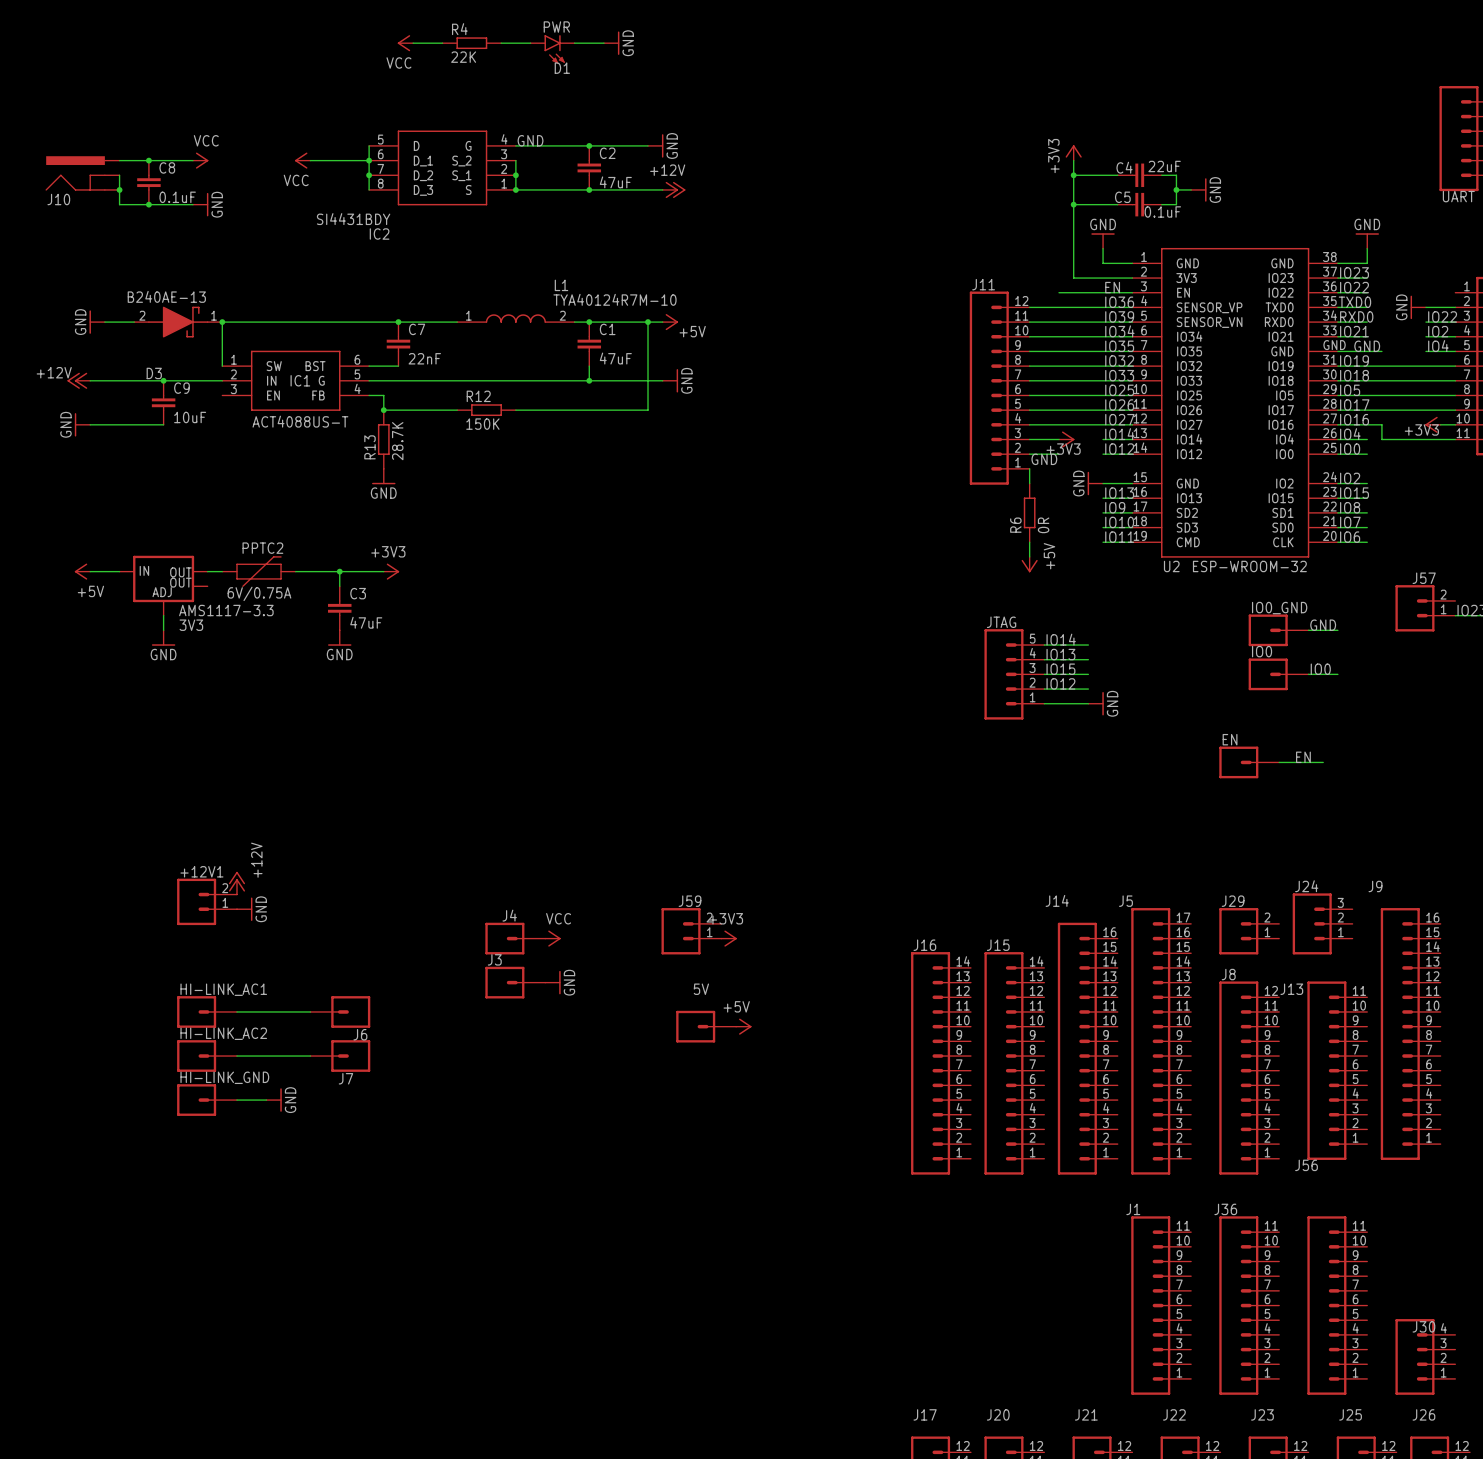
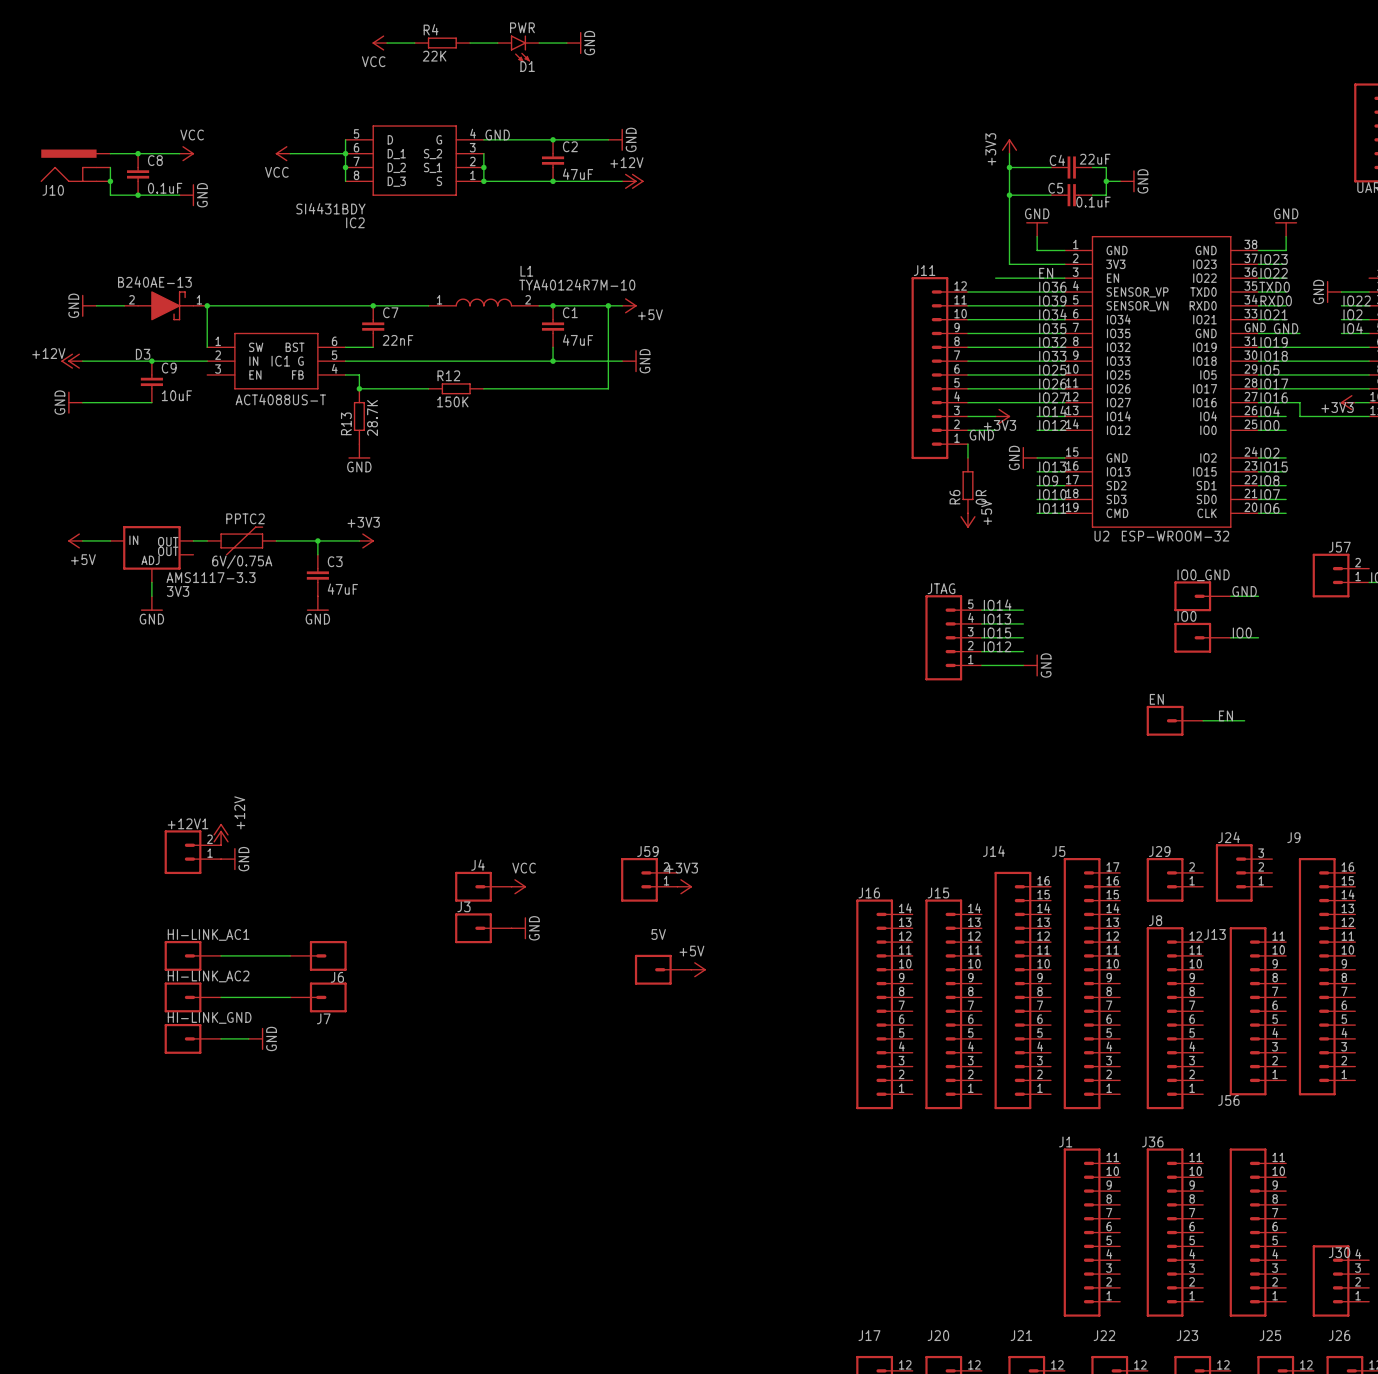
power symbol position: +5V (1029, 564) -> +5V (967, 520)

